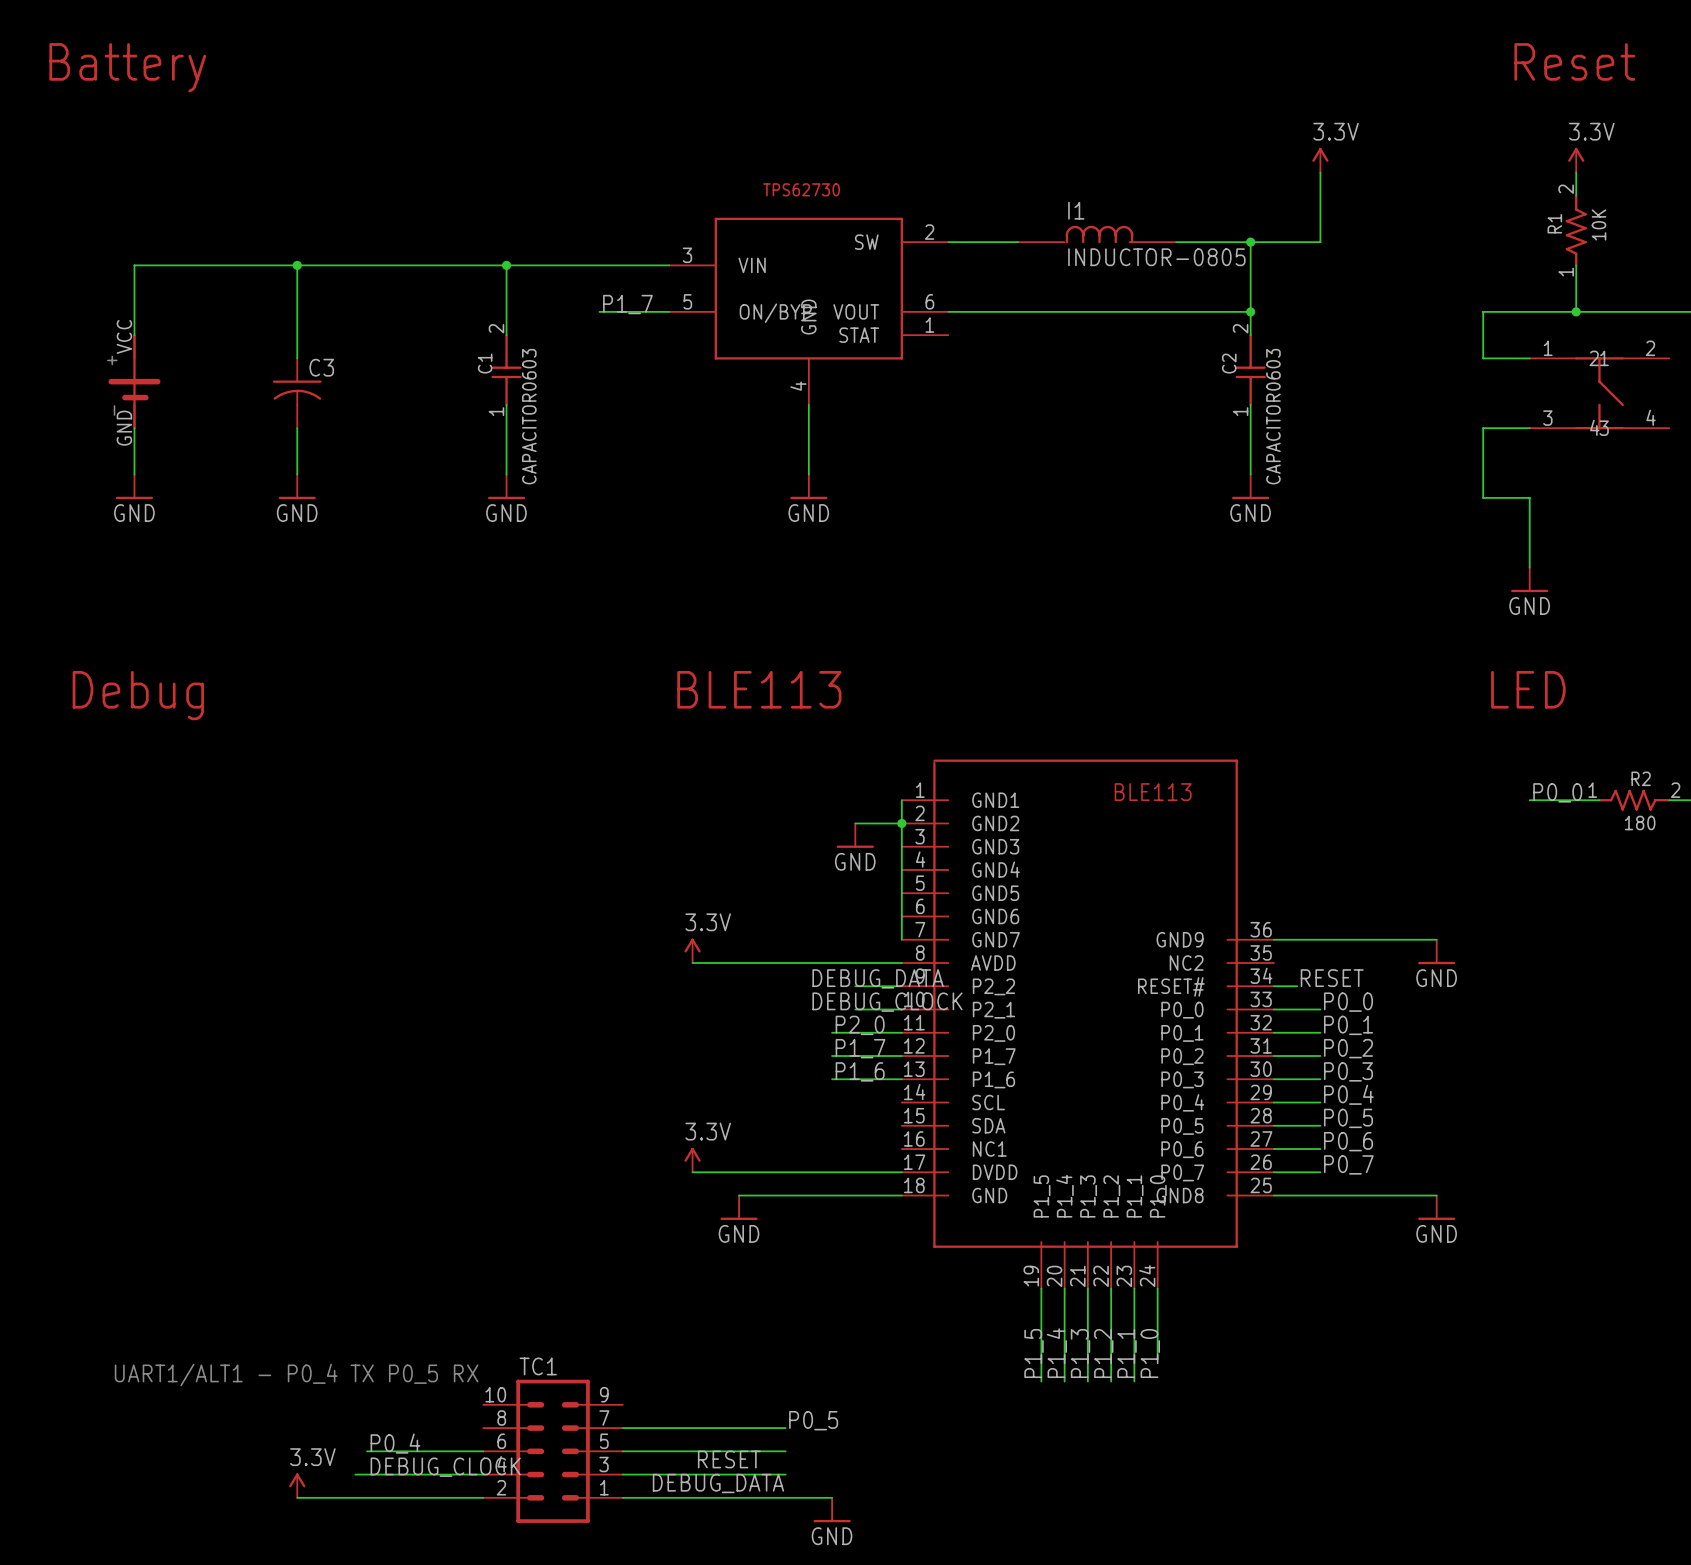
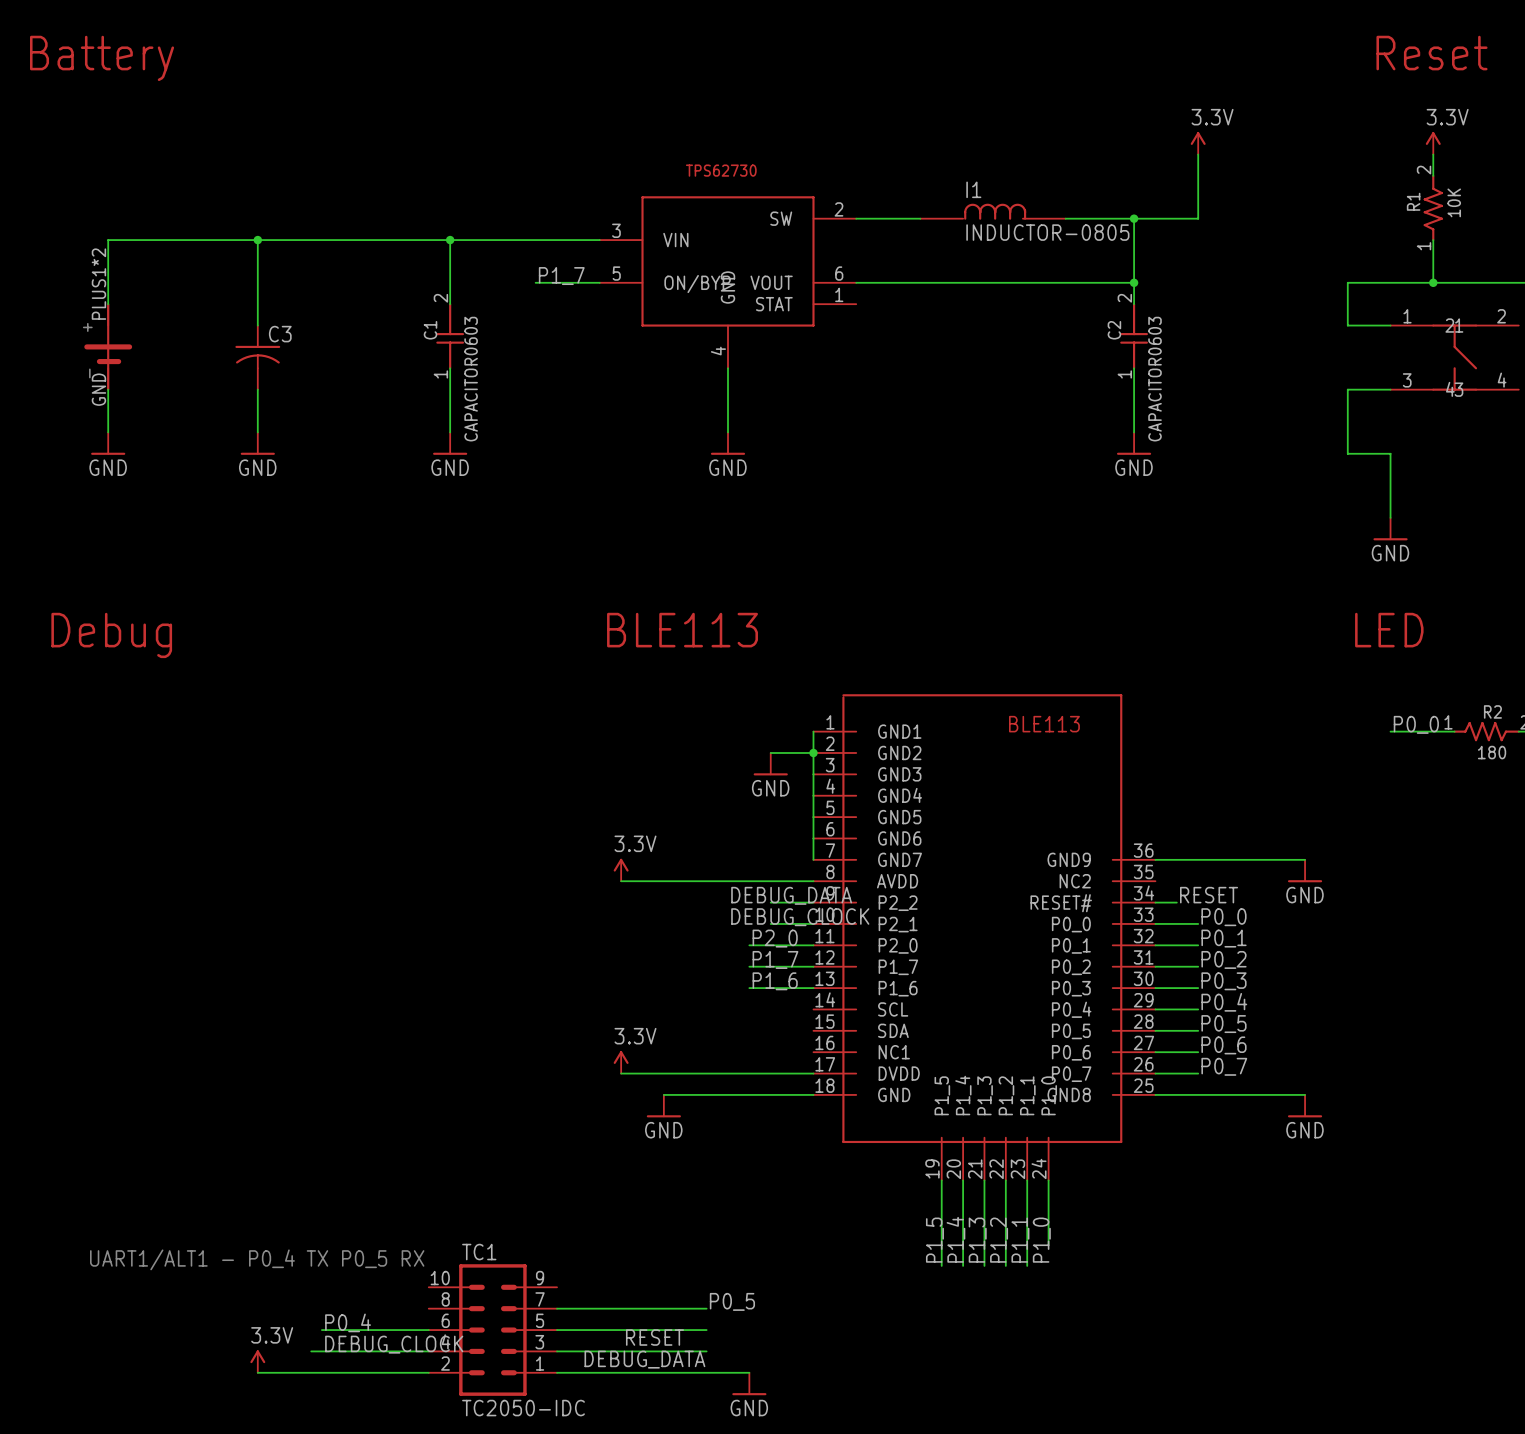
part pin number: VCC (124, 336) -> PLUS1*2 (98, 284)
TC1 value: none -> TC2050-IDC (523, 1408)

